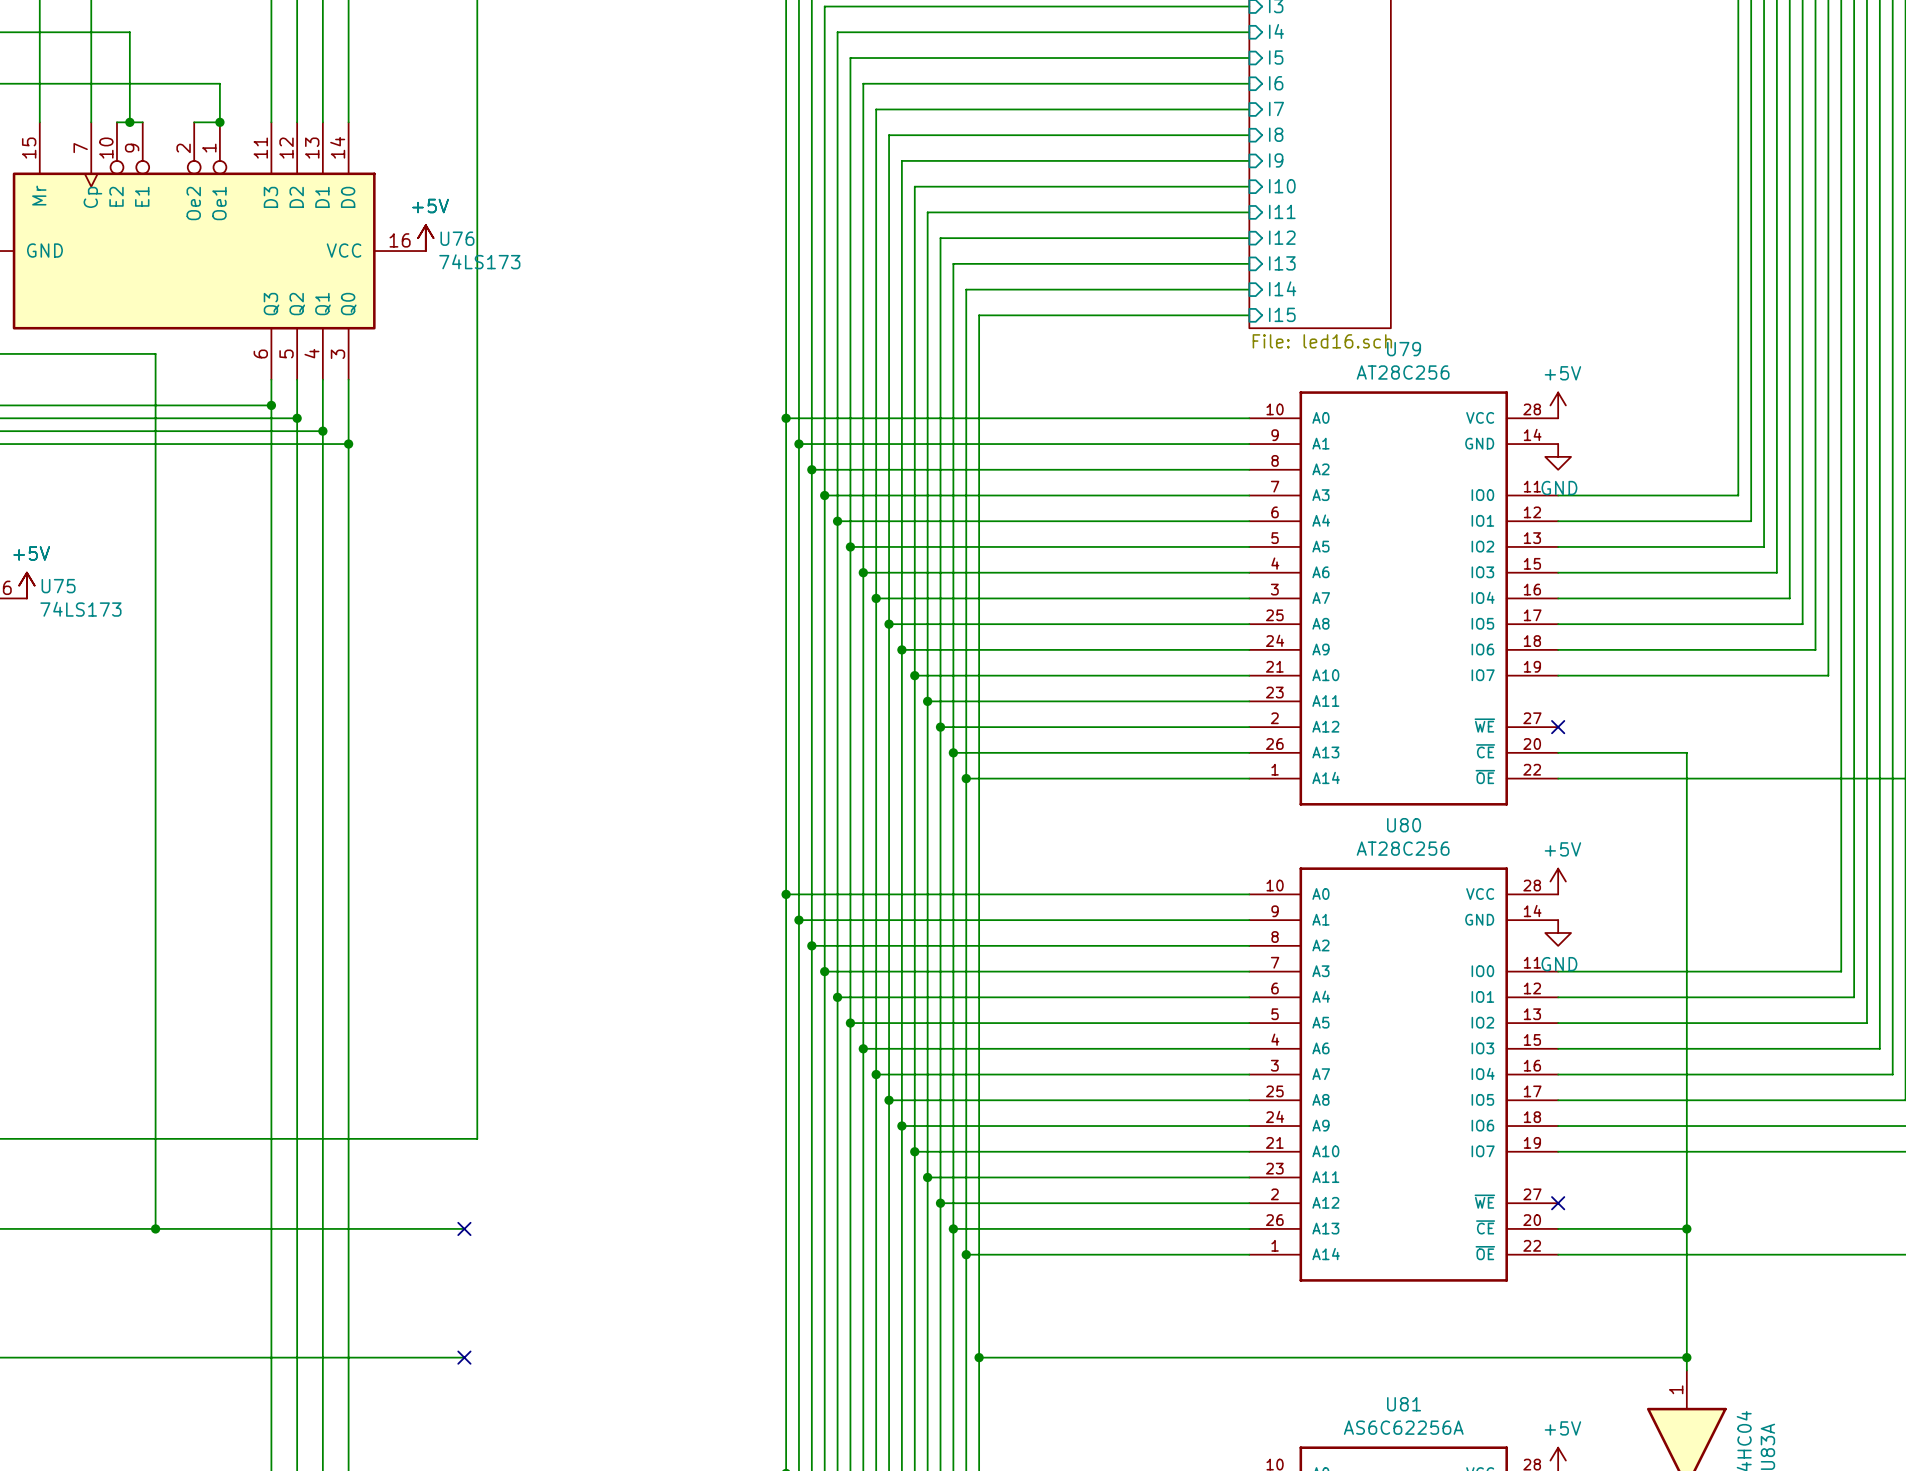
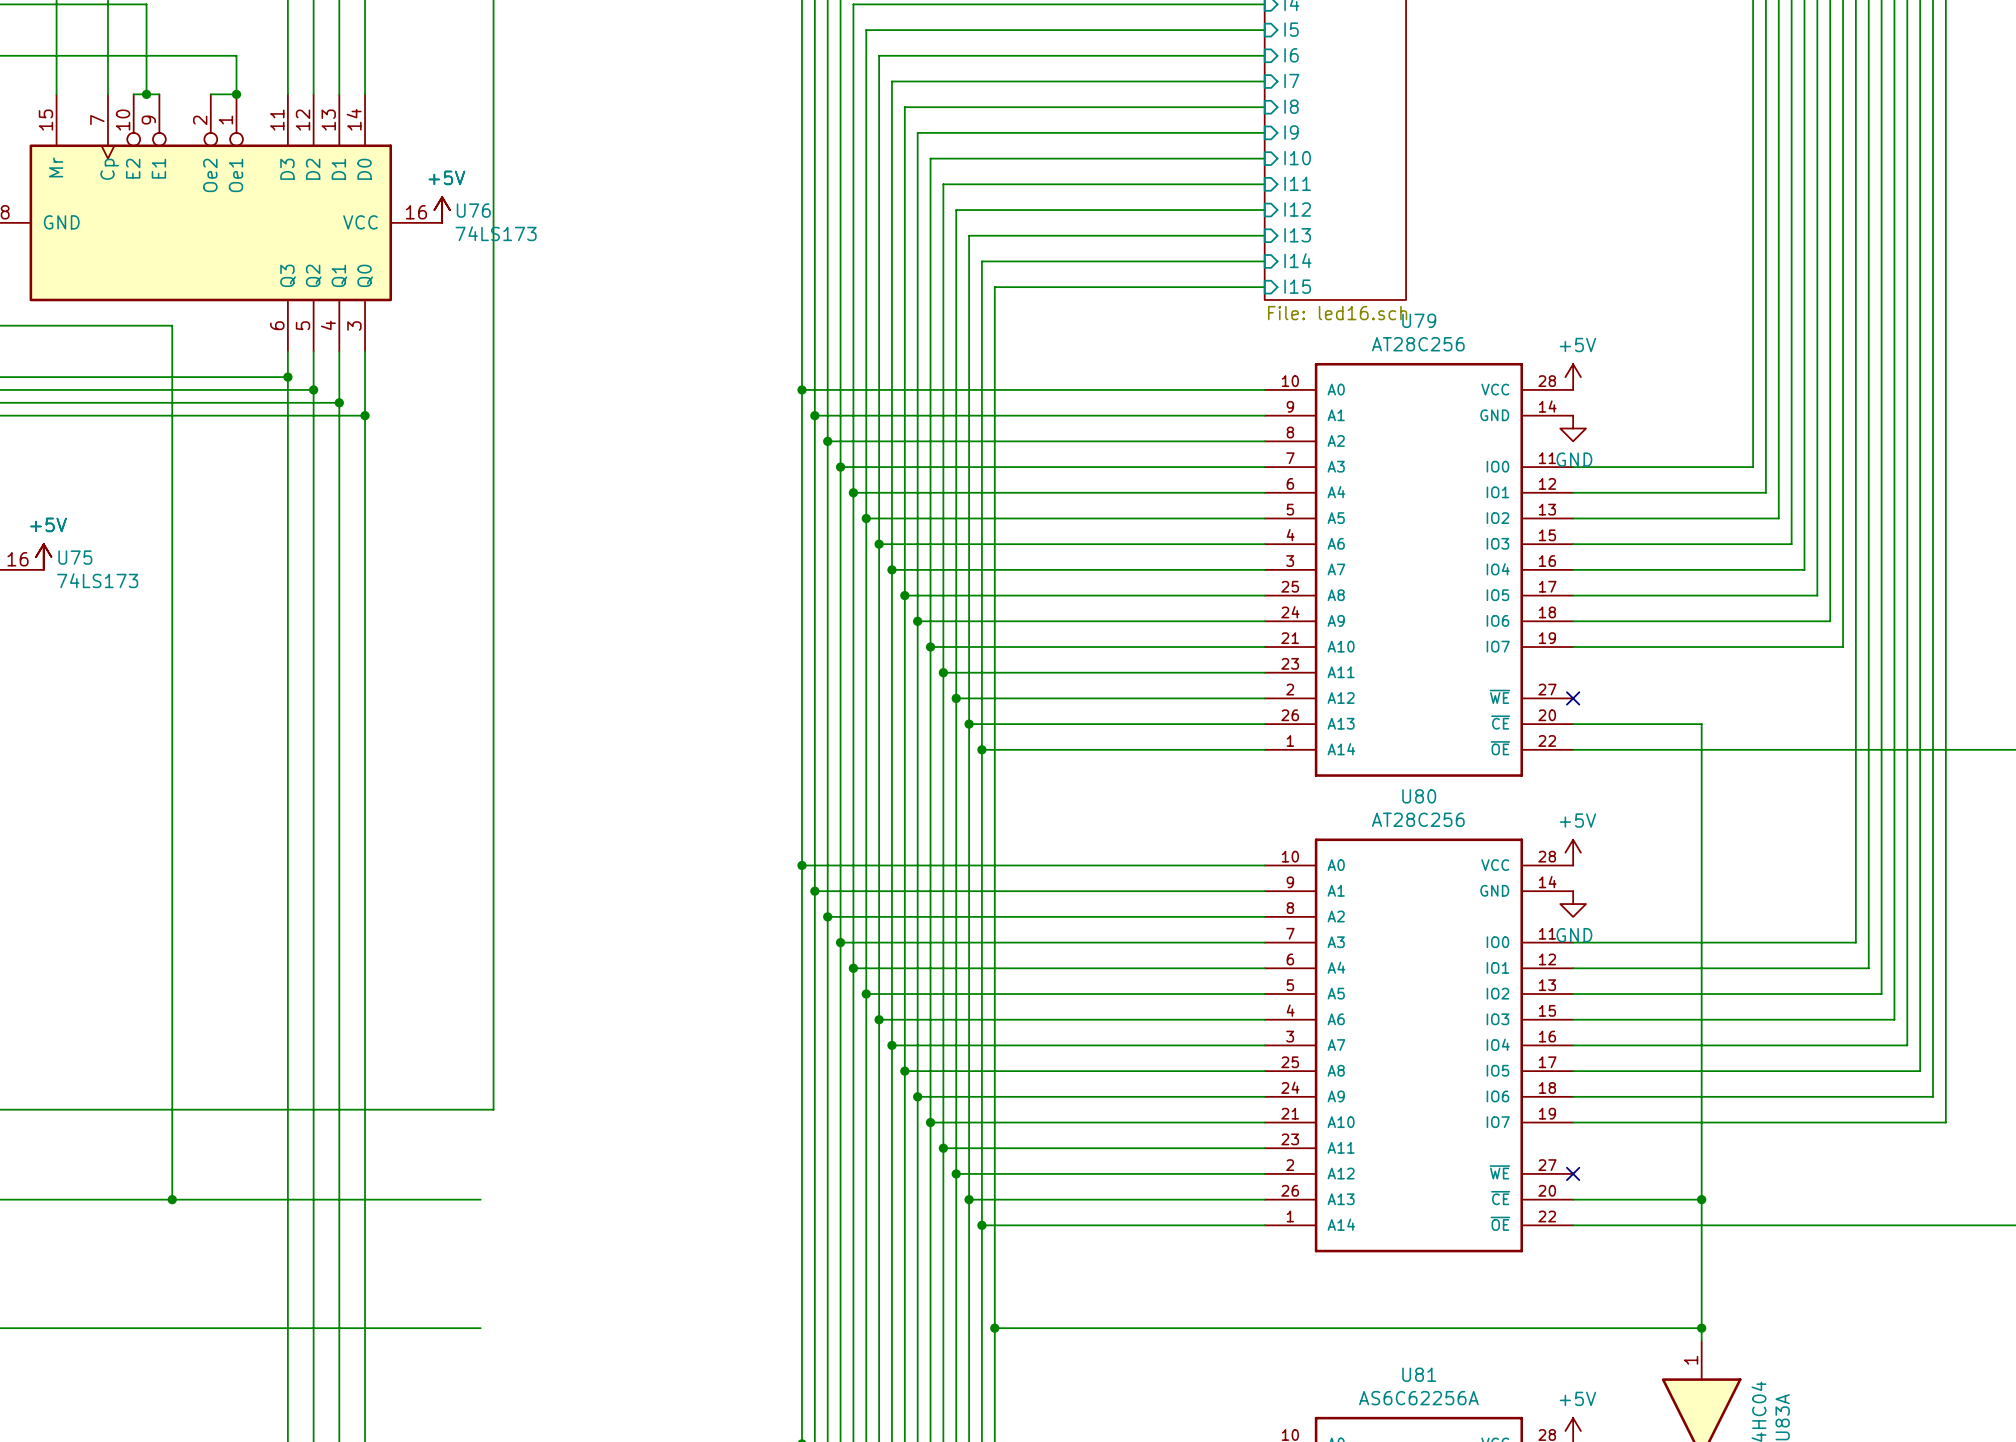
no-connect mark: (464, 1228) -> none
no-connect mark: (464, 1357) -> none

